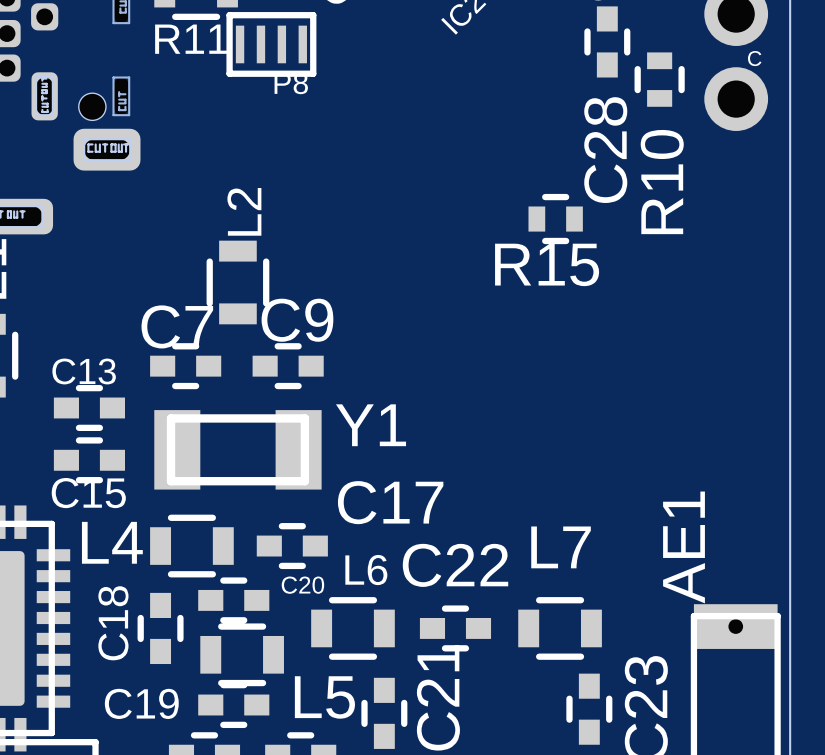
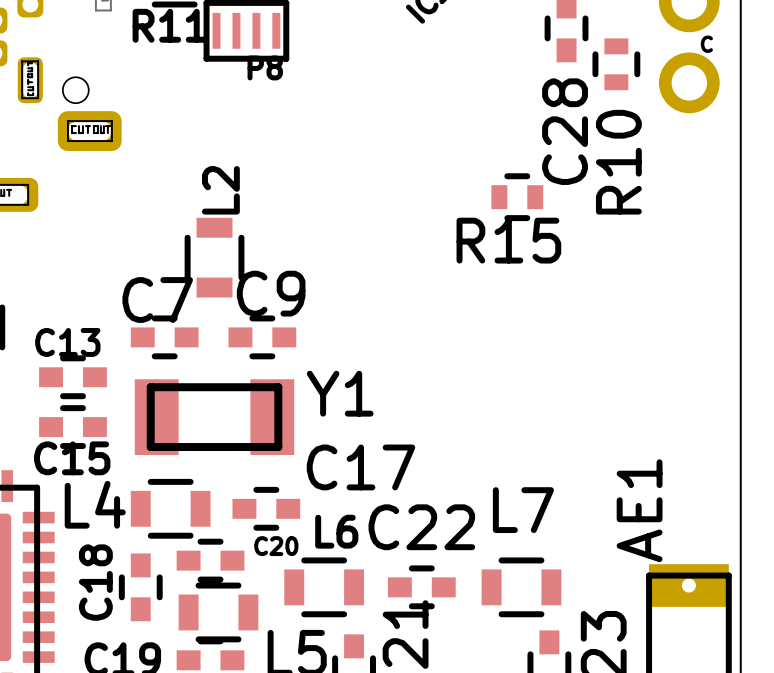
line: (113, 77) (113, 115) (129, 115) (129, 77) (113, 77) -> none
line: (119, 92) (119, 96) -> none
line: (119, 94) (125, 94) -> none
line: (119, 99) (125, 99) (125, 103) -> none
line: (119, 103) (125, 103) -> none
line: (119, 106) (119, 110) (125, 110) (125, 106) -> none

